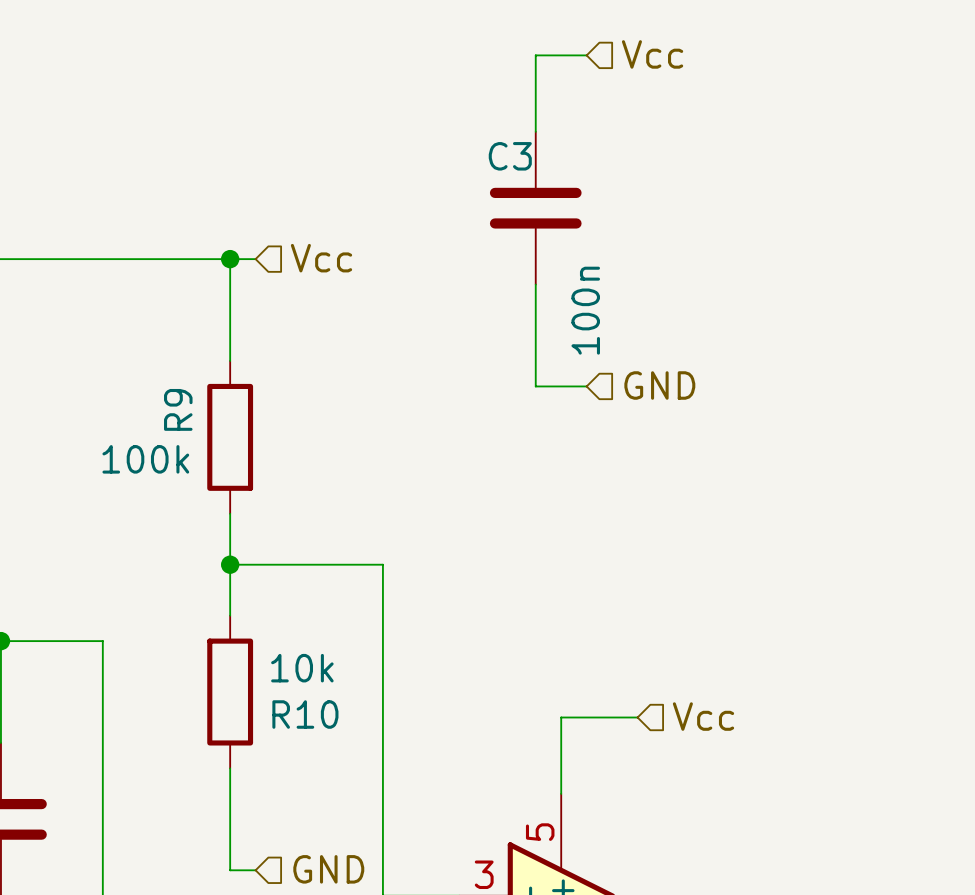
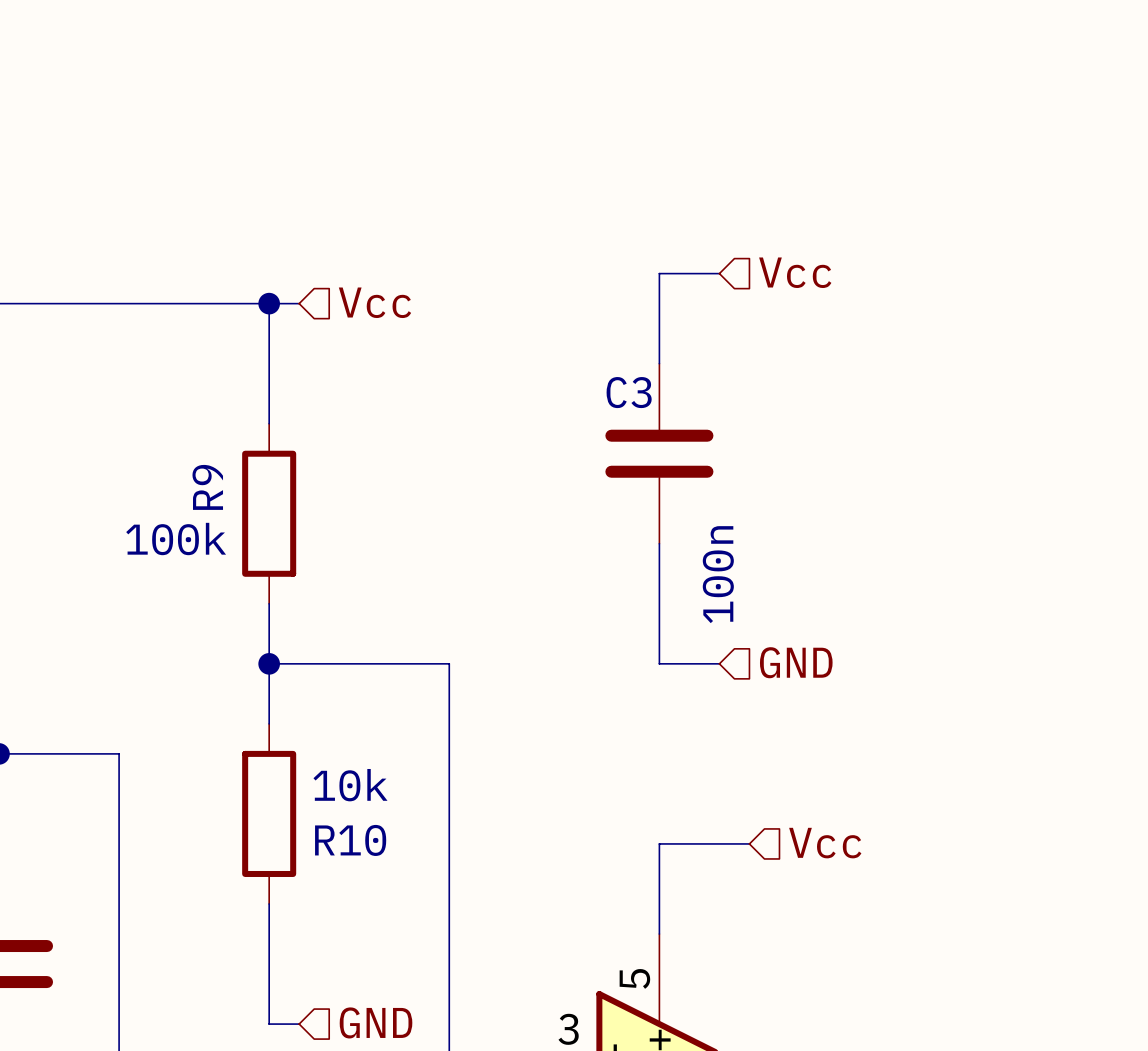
hierarchical label position: Vcc (652, 54) -> Vcc (795, 272)
wire: (586, 55) (535, 55) (535, 131) -> (719, 273) (659, 273) (659, 363)
C3 position: (535, 208) -> (659, 453)
wire: (535, 284) (535, 386) (586, 386) -> (659, 543) (659, 663) (719, 663)
hierarchical label position: GND (659, 385) -> GND (796, 662)

